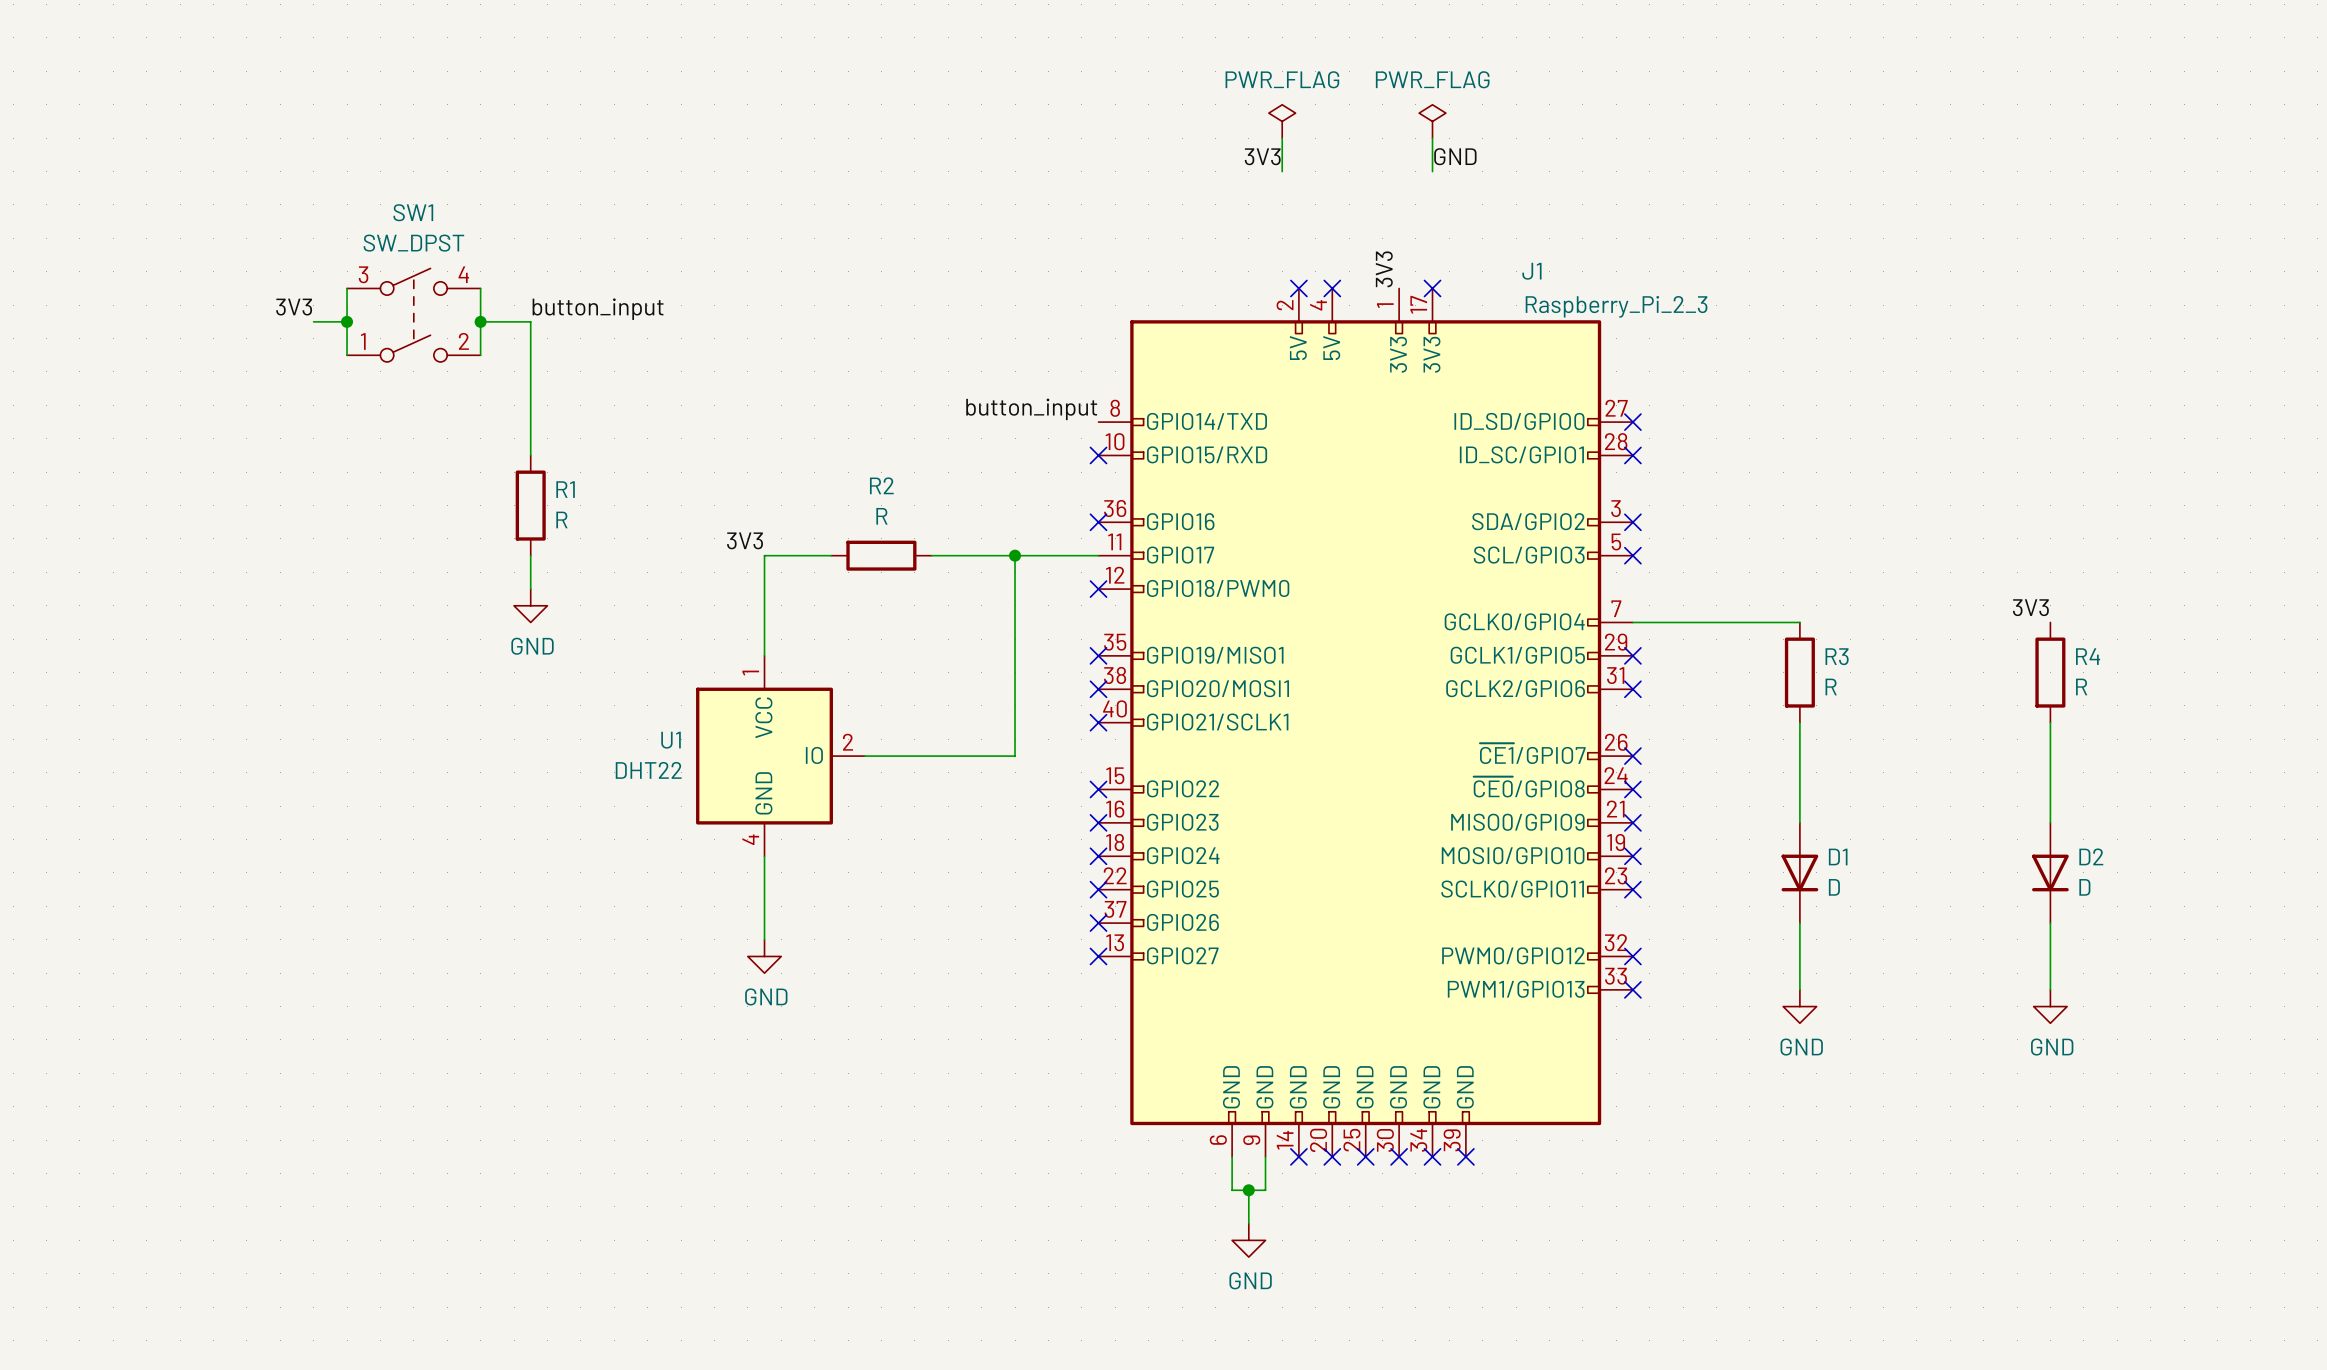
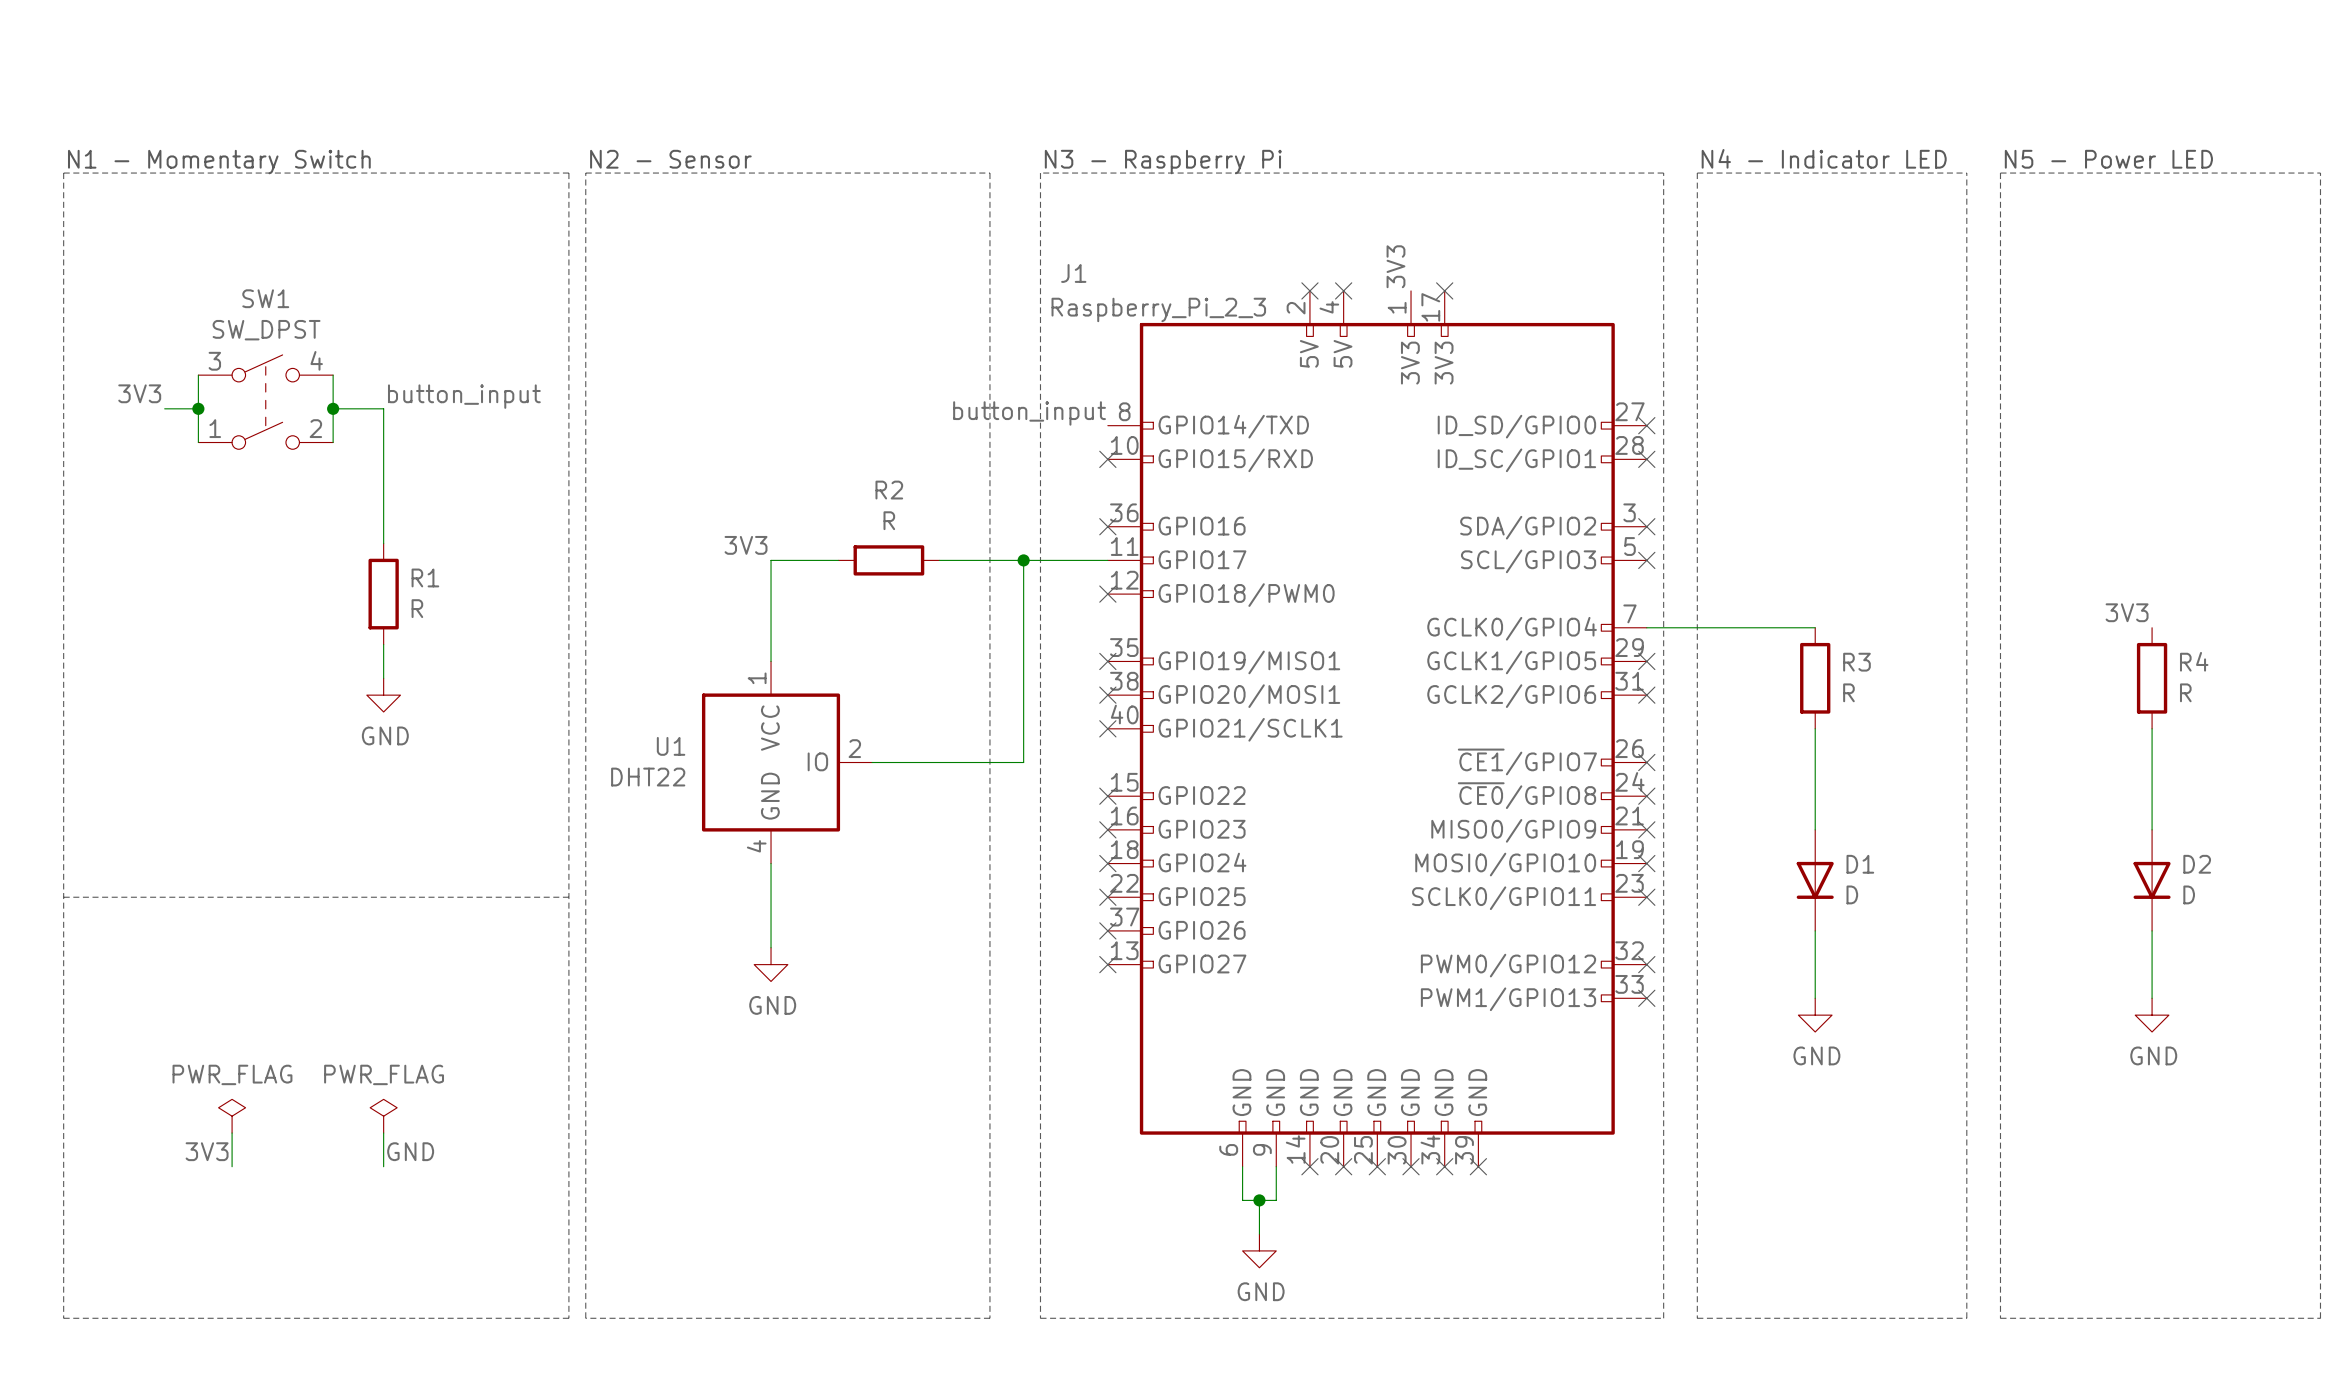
power symbol: PWR_FLAG (1282, 121) -> none
power symbol: PWR_FLAG (1432, 121) -> none
wire: (1282, 138) (1282, 171) -> none
wire: (1432, 138) (1432, 171) -> none
label: 3V3 (1262, 156) -> none
label: GND (1455, 156) -> none
text: none -> N2 - Sensor (670, 159)
text: none -> N4 - Indicator LED (1824, 158)
text: none -> N5 - Power LED (2108, 159)
text: none -> N1 - Momentary Switch (219, 162)
text: none -> N3 - Raspberry Pi (1163, 162)
line: none -> (63, 173) (568, 173) (568, 1318) (63, 1318) (63, 173)
line: none -> (585, 173) (989, 173) (989, 1318) (585, 1318) (585, 173)
line: none -> (1040, 173) (1663, 173) (1663, 1318) (1040, 1318) (1040, 173)
line: none -> (1697, 173) (1966, 173) (1966, 1318) (1697, 1318) (1697, 173)
line: none -> (2000, 173) (2320, 173) (2320, 1318) (2000, 1318) (2000, 173)
J1 name position: J1 (1531, 271) -> J1 (1073, 273)
wire: (347, 288) (347, 355) -> (198, 375) (198, 442)
wire: (480, 288) (480, 355) -> (333, 375) (333, 442)
J1 value position: Raspberry_Pi_2_3 (1616, 306) -> Raspberry_Pi_2_3 (1158, 309)
label position: 3V3 (294, 307) -> 3V3 (139, 393)
label position: button_input (598, 309) -> button_input (464, 396)
SW1 position: (413, 315) -> (265, 402)
wire: (313, 321) (347, 321) -> (164, 408) (198, 408)
junction: (347, 321) -> none
wire: (480, 321) (530, 321) (530, 455) -> (333, 408) (383, 408) (383, 543)
junction: (480, 321) -> none
junction: none -> (198, 408)
junction: none -> (333, 408)
R1 position: (530, 505) -> (383, 594)
wire: (530, 555) (530, 589) -> (383, 644) (383, 678)
power symbol position: GND (530, 605) -> GND (383, 695)
label position: 3V3 (2030, 607) -> 3V3 (2127, 612)
R4 position: (2050, 672) -> (2152, 678)
wire: (2050, 722) (2050, 822) -> (2152, 728) (2152, 829)
D2 position: (2050, 872) -> (2152, 880)
line: none -> (63, 897) (568, 897)
wire: (2050, 923) (2050, 989) -> (2152, 930) (2152, 998)
power symbol position: GND (2050, 1006) -> GND (2152, 1015)
power symbol: none -> PWR_FLAG (232, 1116)
power symbol: none -> PWR_FLAG (383, 1116)
wire: none -> (232, 1133) (232, 1166)
wire: none -> (383, 1133) (383, 1166)
label: none -> GND (410, 1151)
label: none -> 3V3 (207, 1151)

